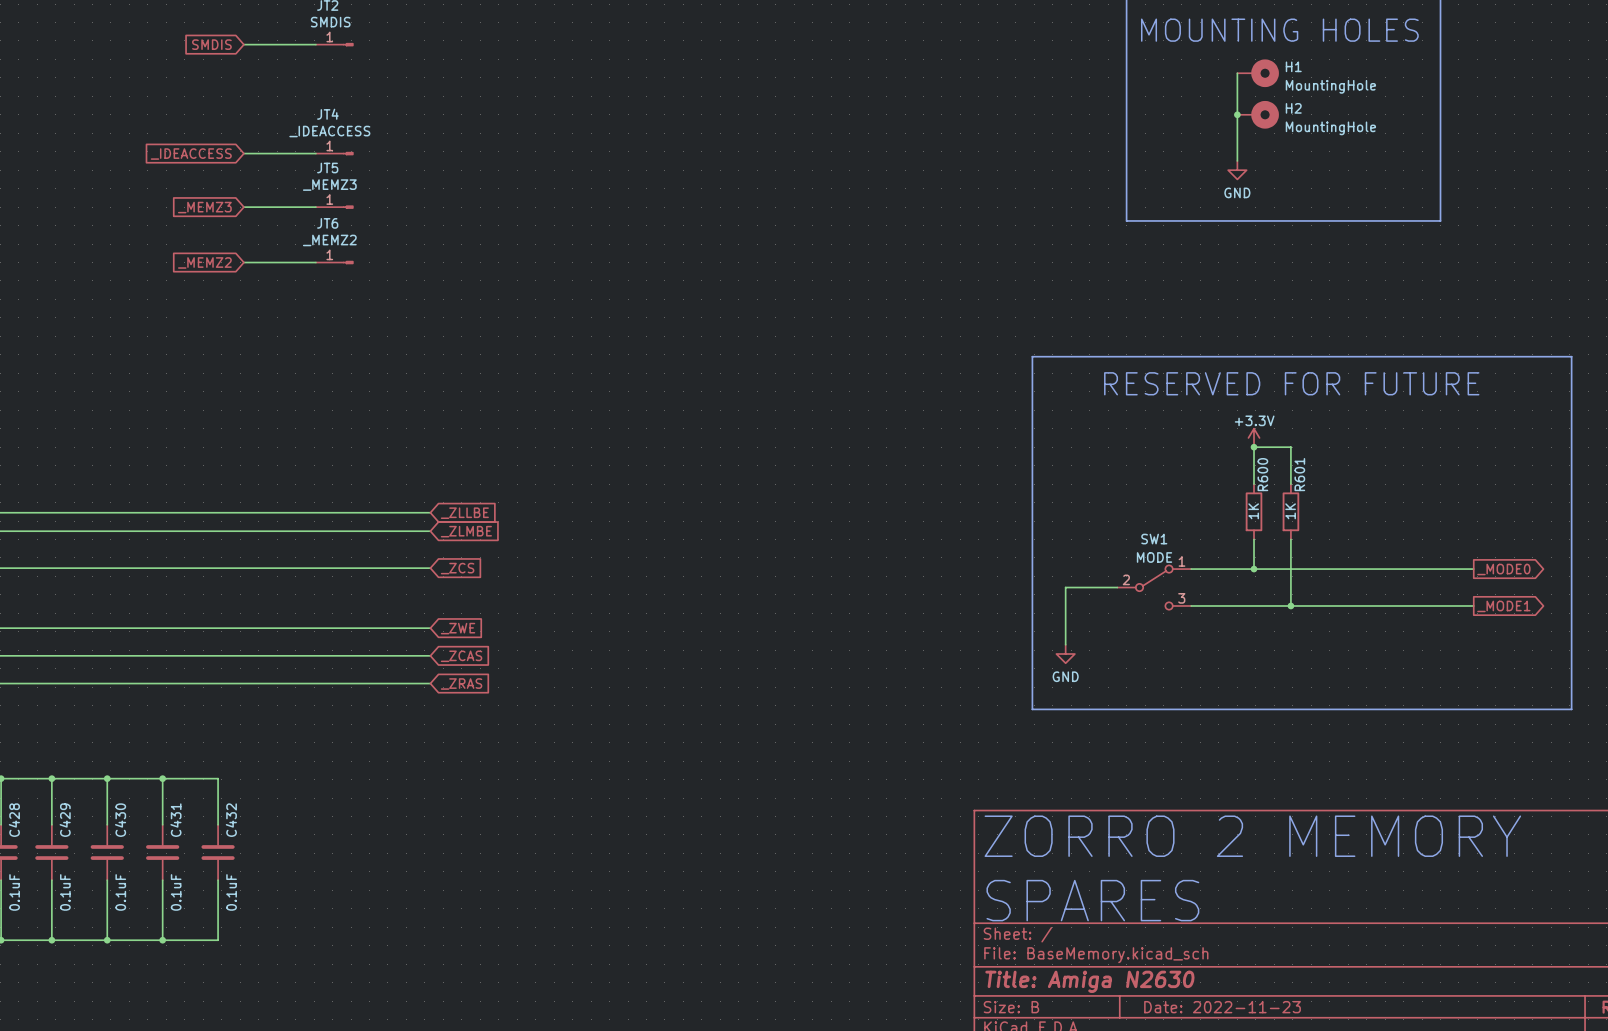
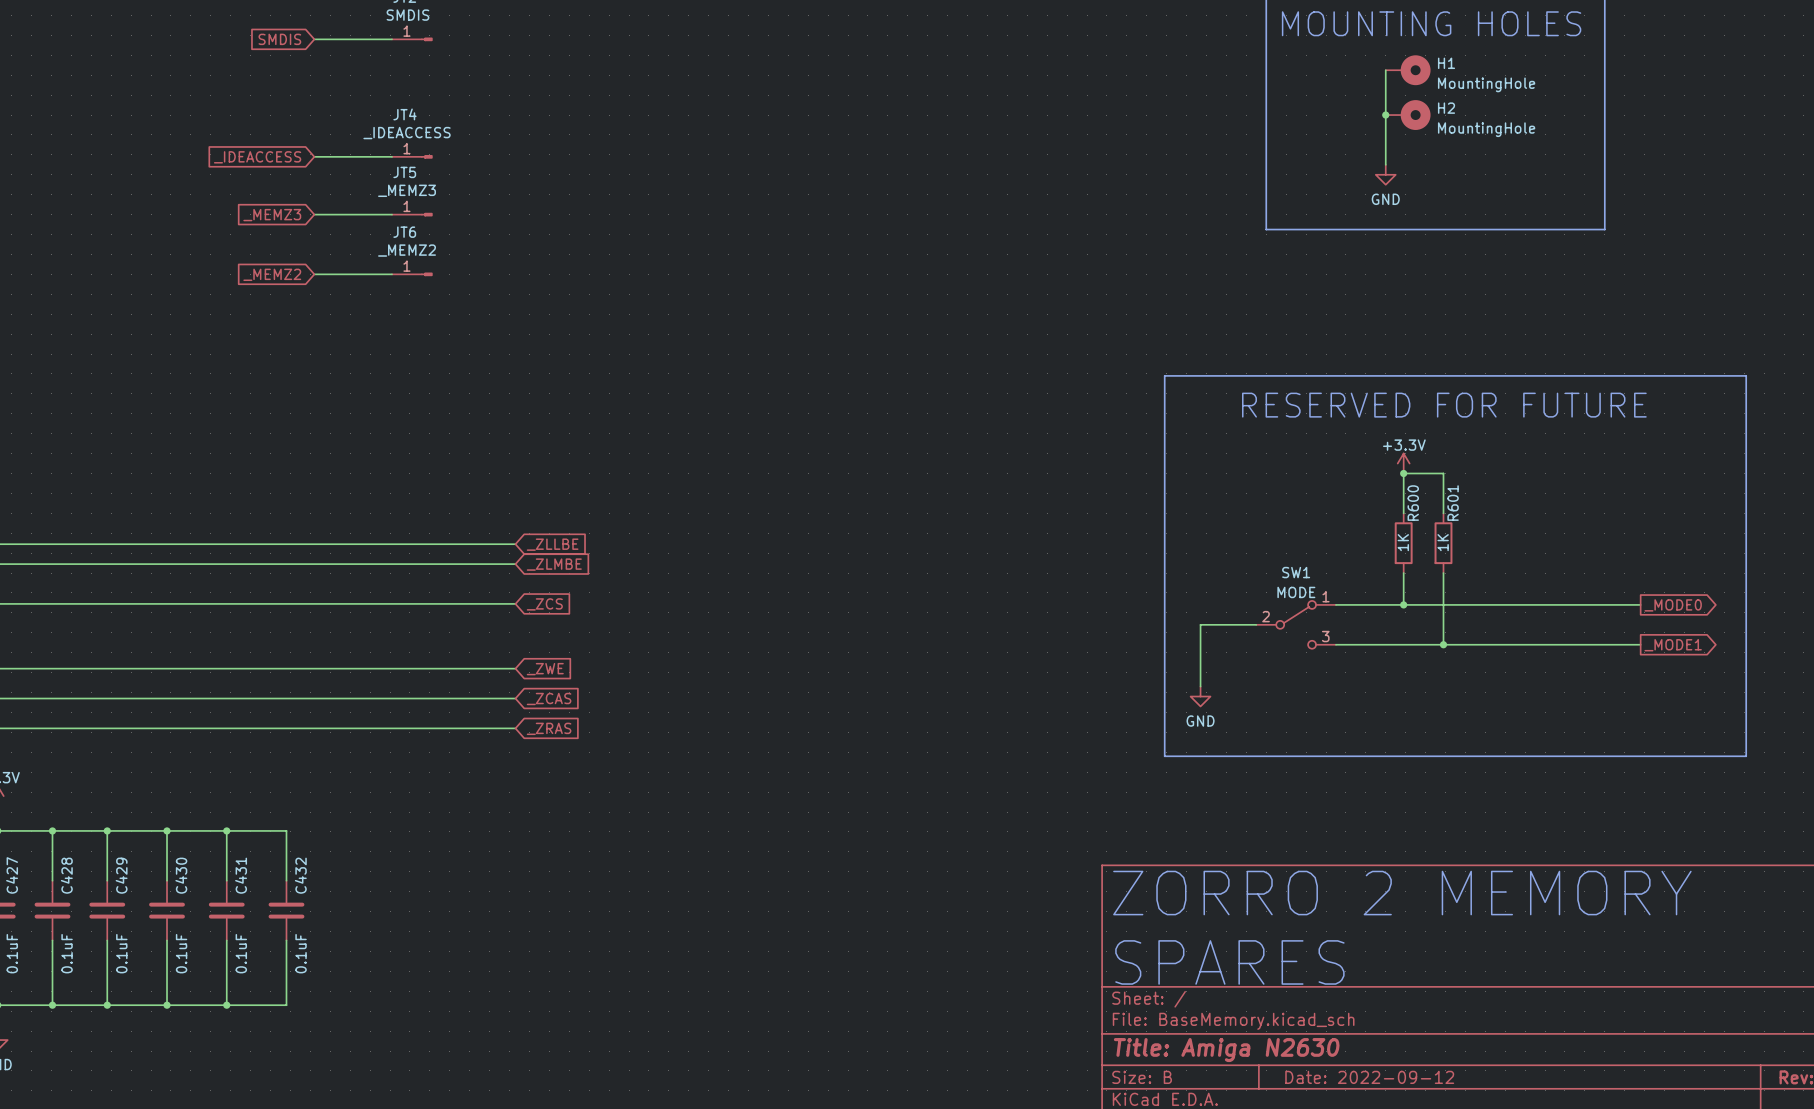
title block: Date: 2022-11-23 (1222, 1007) -> Date: 2022-09-12 (1369, 1077)

